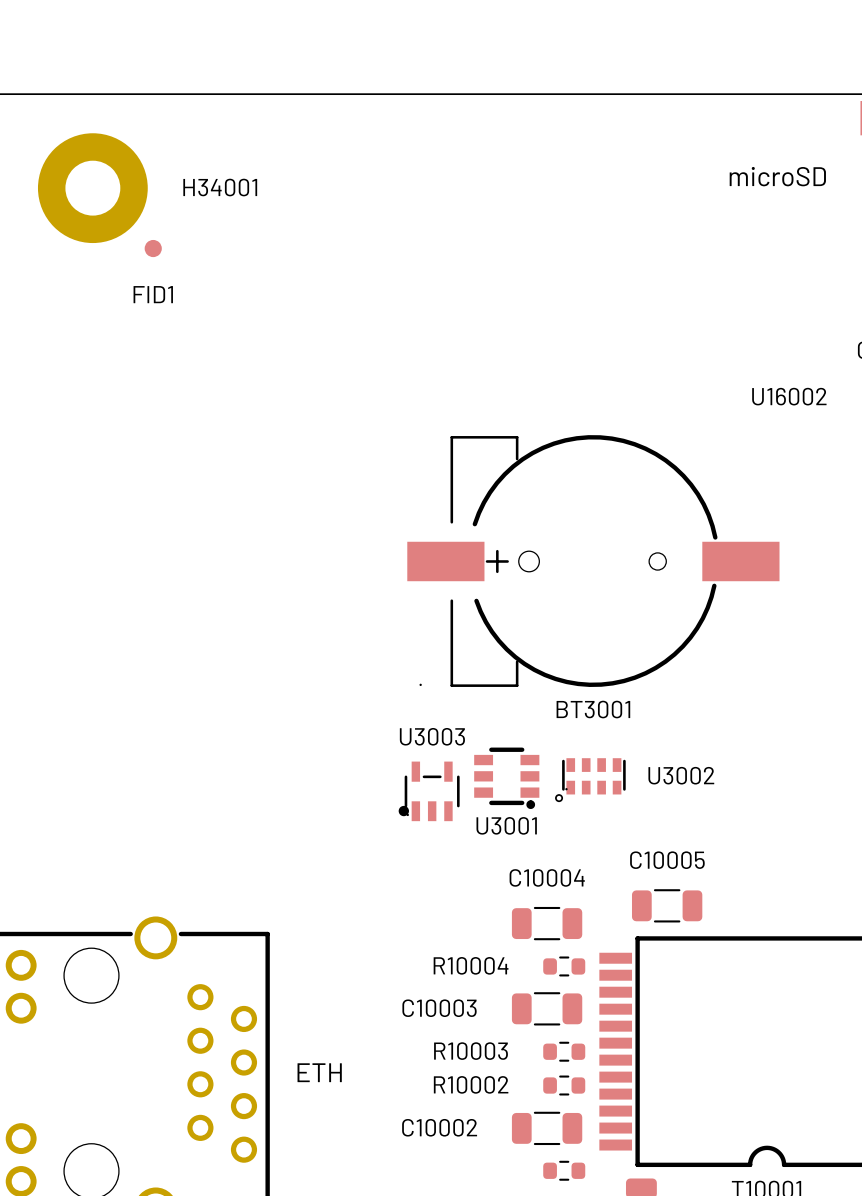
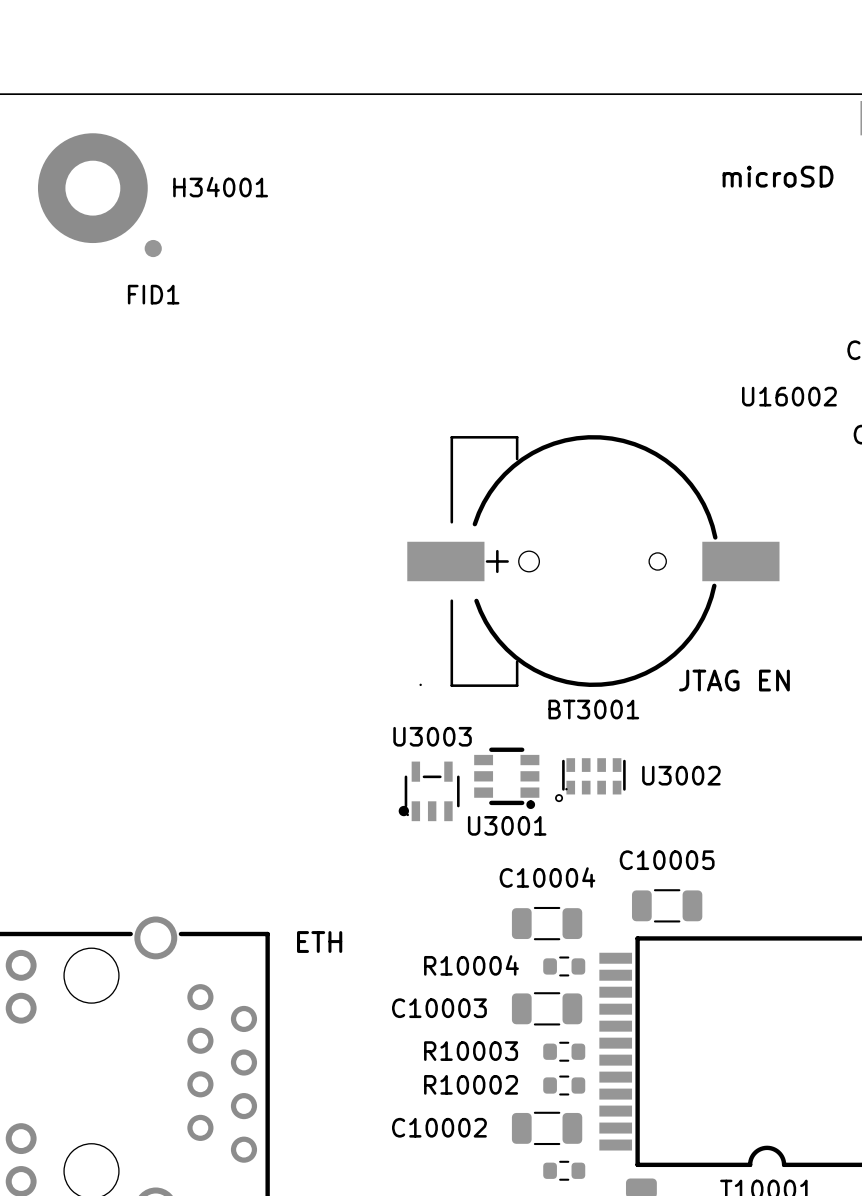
text: none -> JTAG EN (734, 680)
text position: ETH (319, 1072) -> ETH (319, 942)

